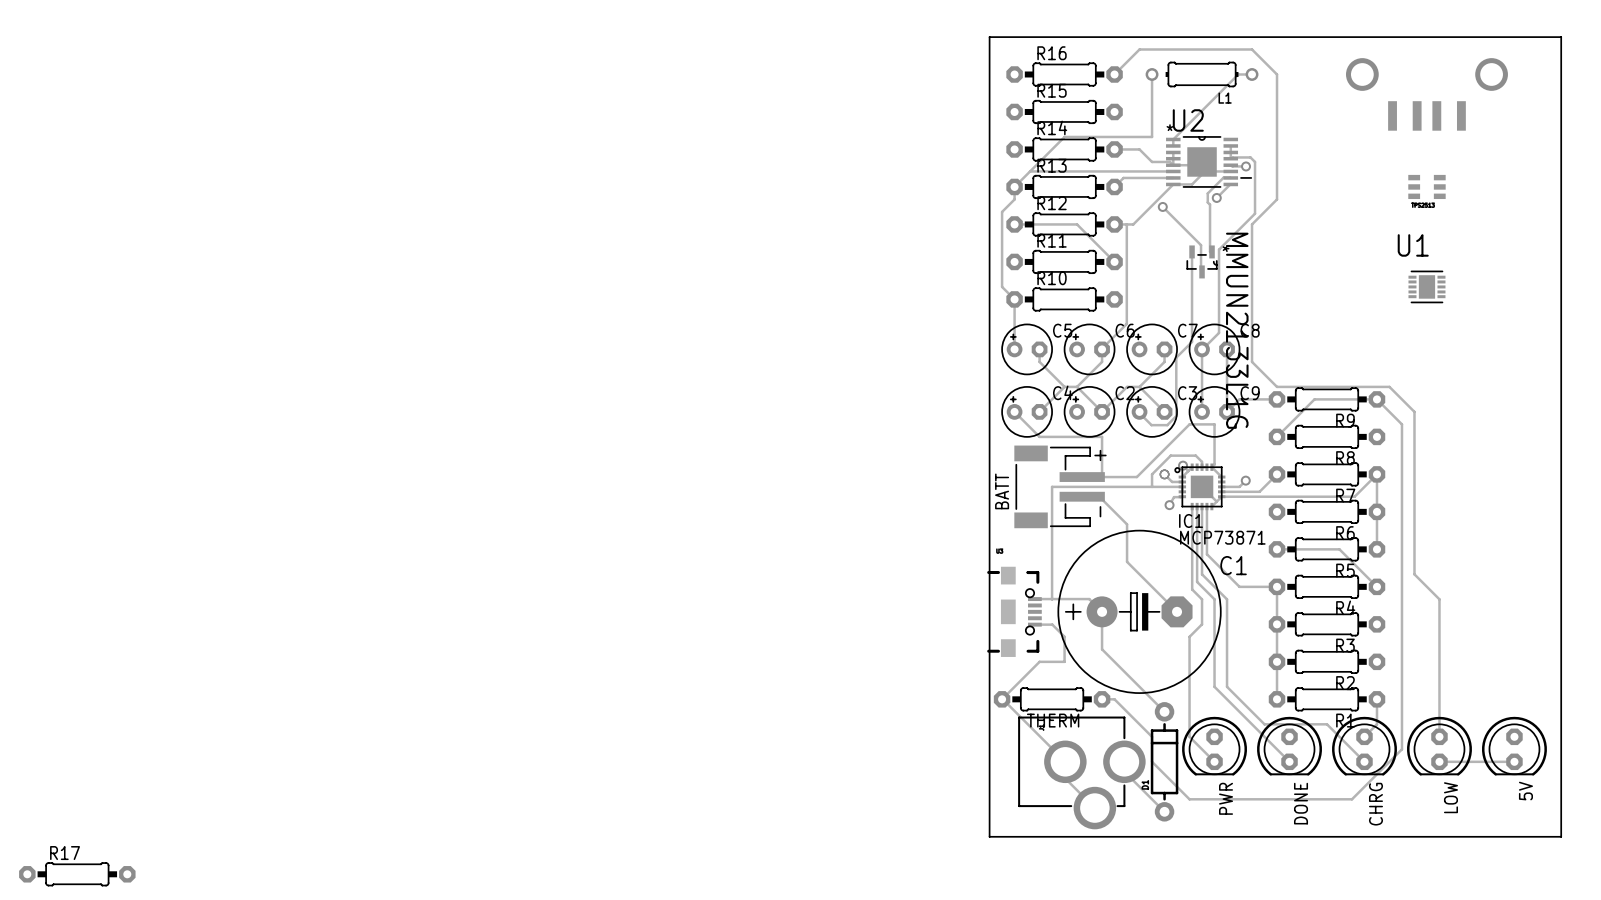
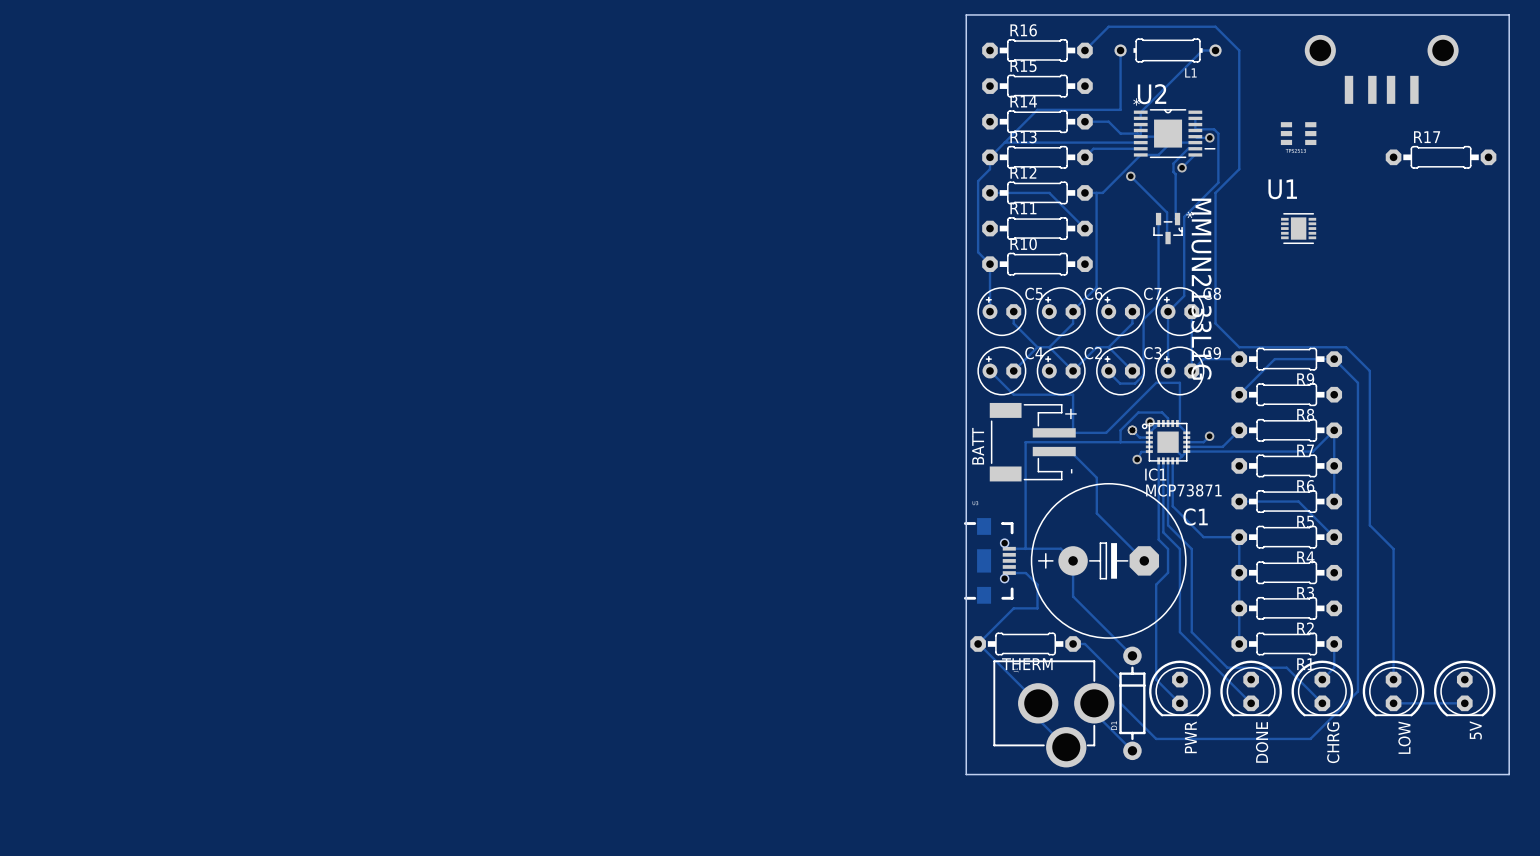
part position: (1426, 186) -> (1298, 133)
U1 position: (1426, 286) -> (1298, 228)
R17 position: (77, 874) -> (1441, 157)

